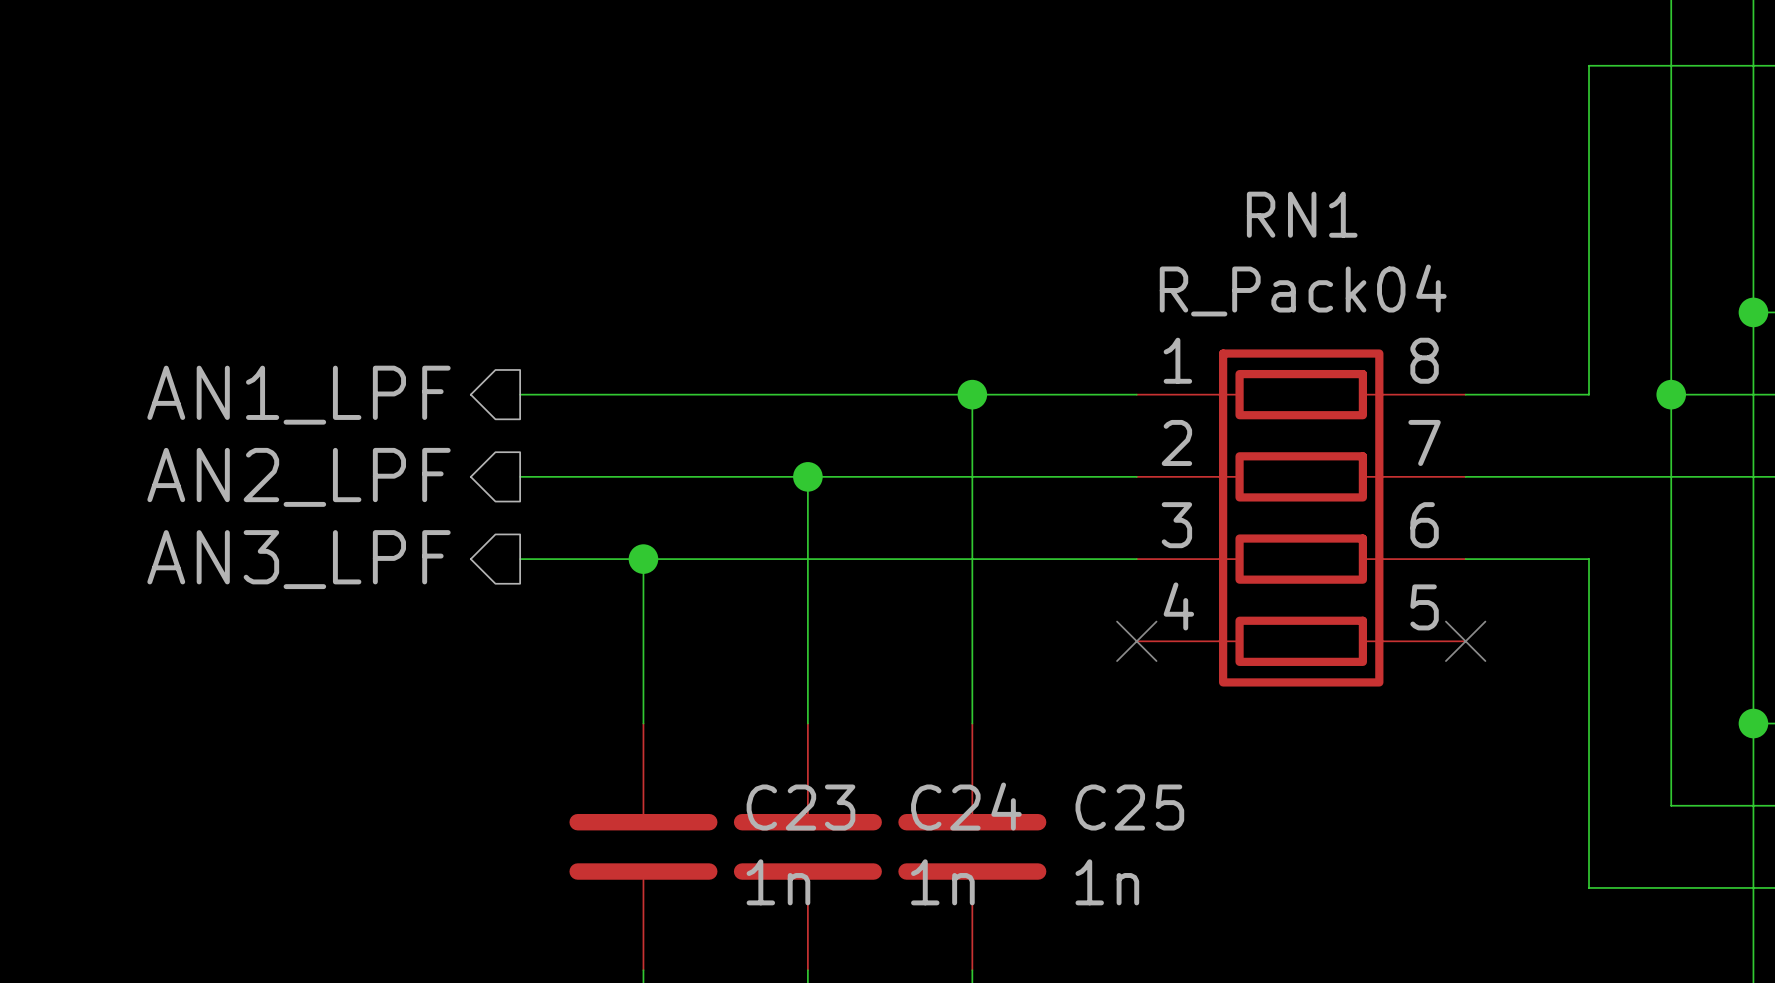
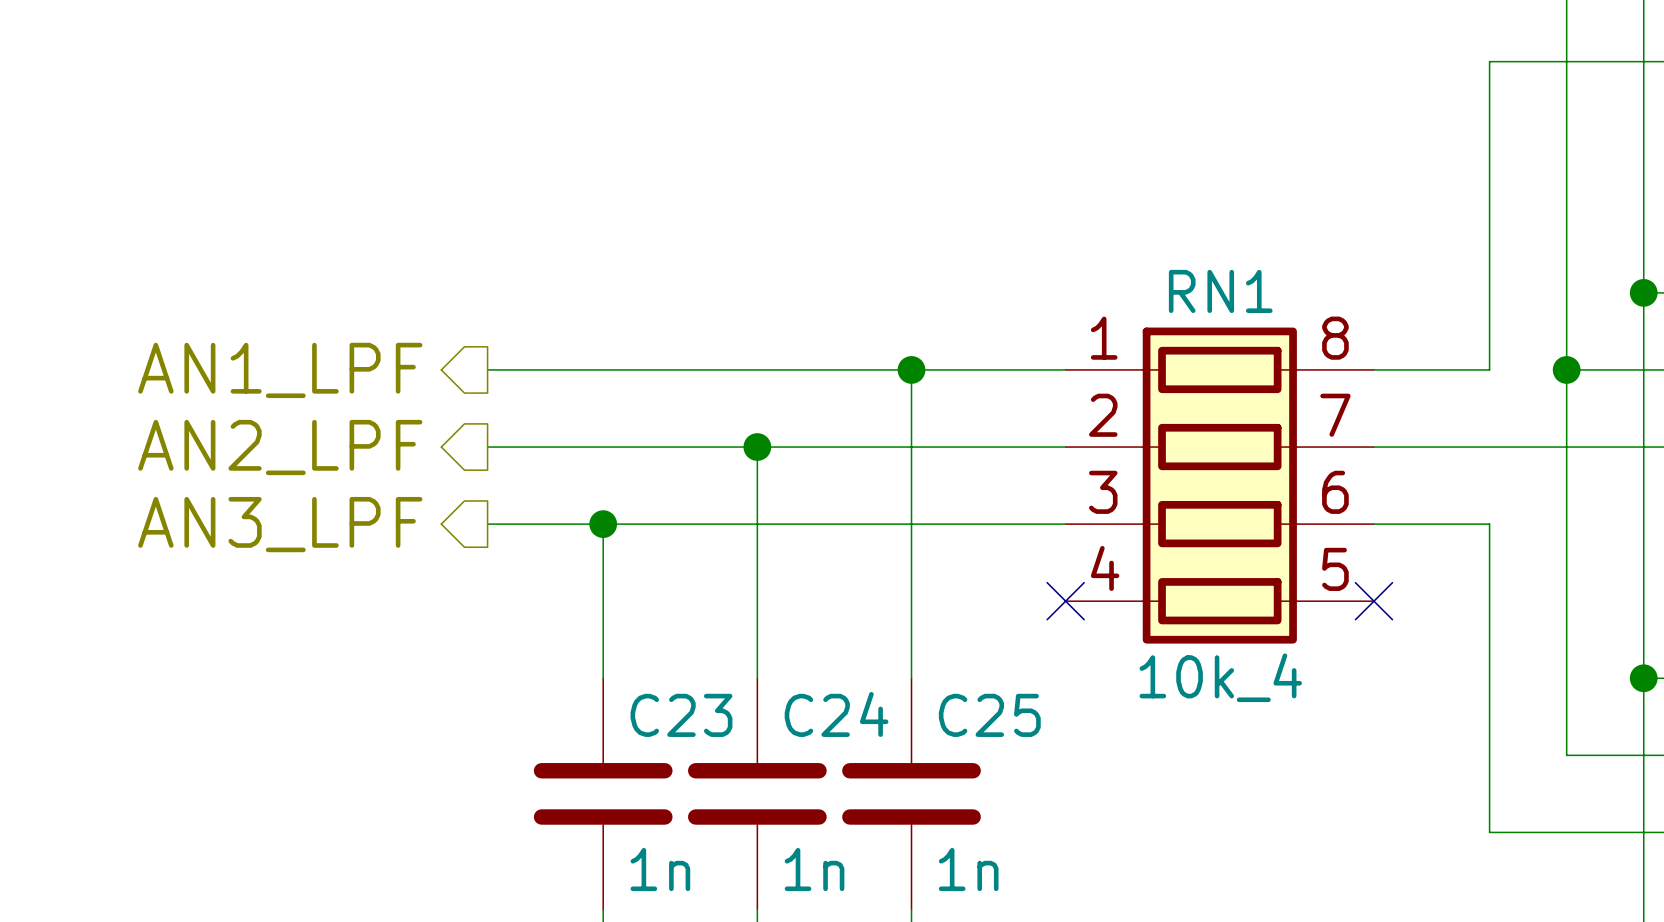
RN1 name position: RN1 (1302, 214) -> RN1 (1220, 291)
RN1 value: R_Pack04 (1303, 290) -> 10k_4 (1220, 677)
C24 name position: C24 (966, 806) -> C24 (836, 714)
C23 name position: C23 (800, 807) -> C23 (681, 715)
C25 name position: C25 (1129, 807) -> C25 (989, 715)
C23 value position: 1n (778, 882) -> 1n (660, 869)
C24 value position: 1n (942, 882) -> 1n (814, 869)
C25 value position: 1n (1107, 882) -> 1n (968, 869)

